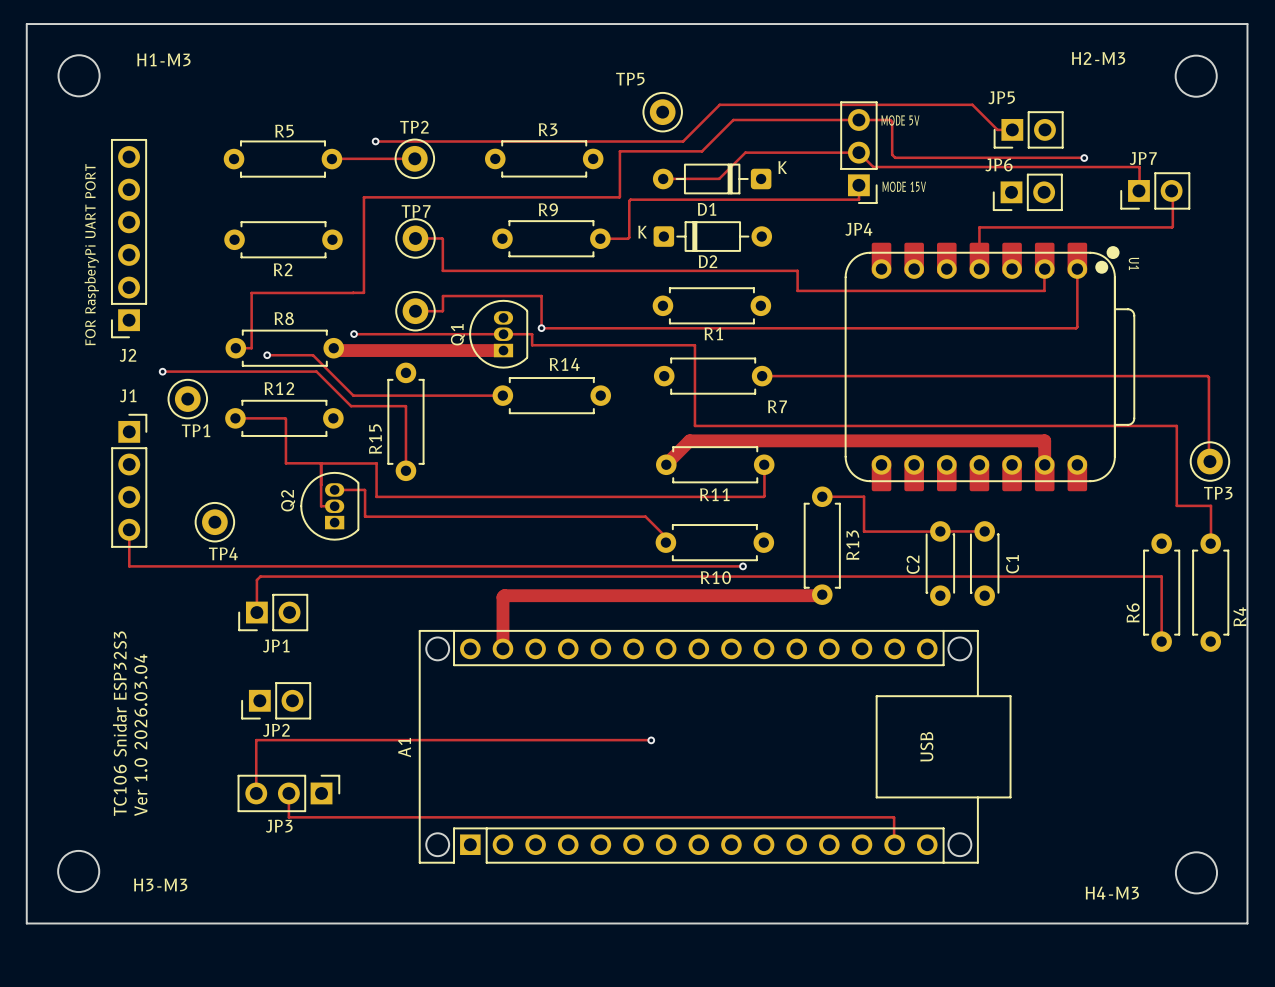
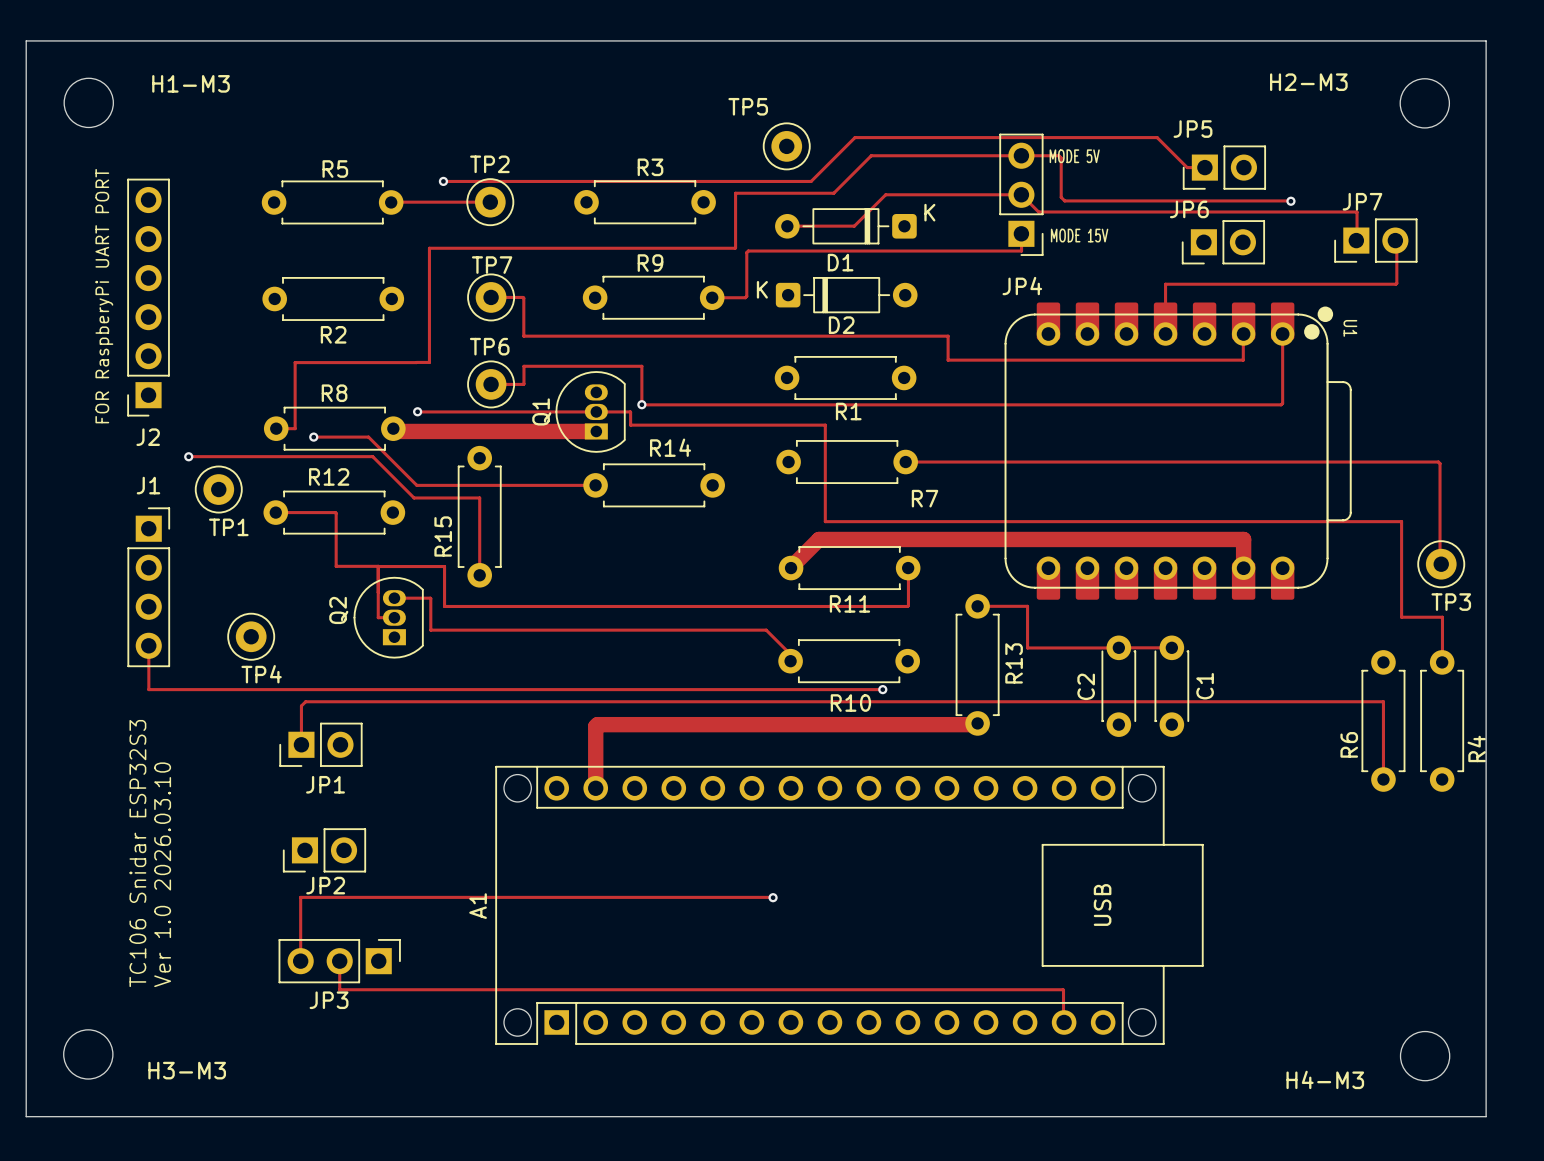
TP6 name: none -> TP6 (489, 346)
text: Ver 1.0 2026.03.04 (140, 735) -> Ver 1.0 2026.03.10 (162, 874)

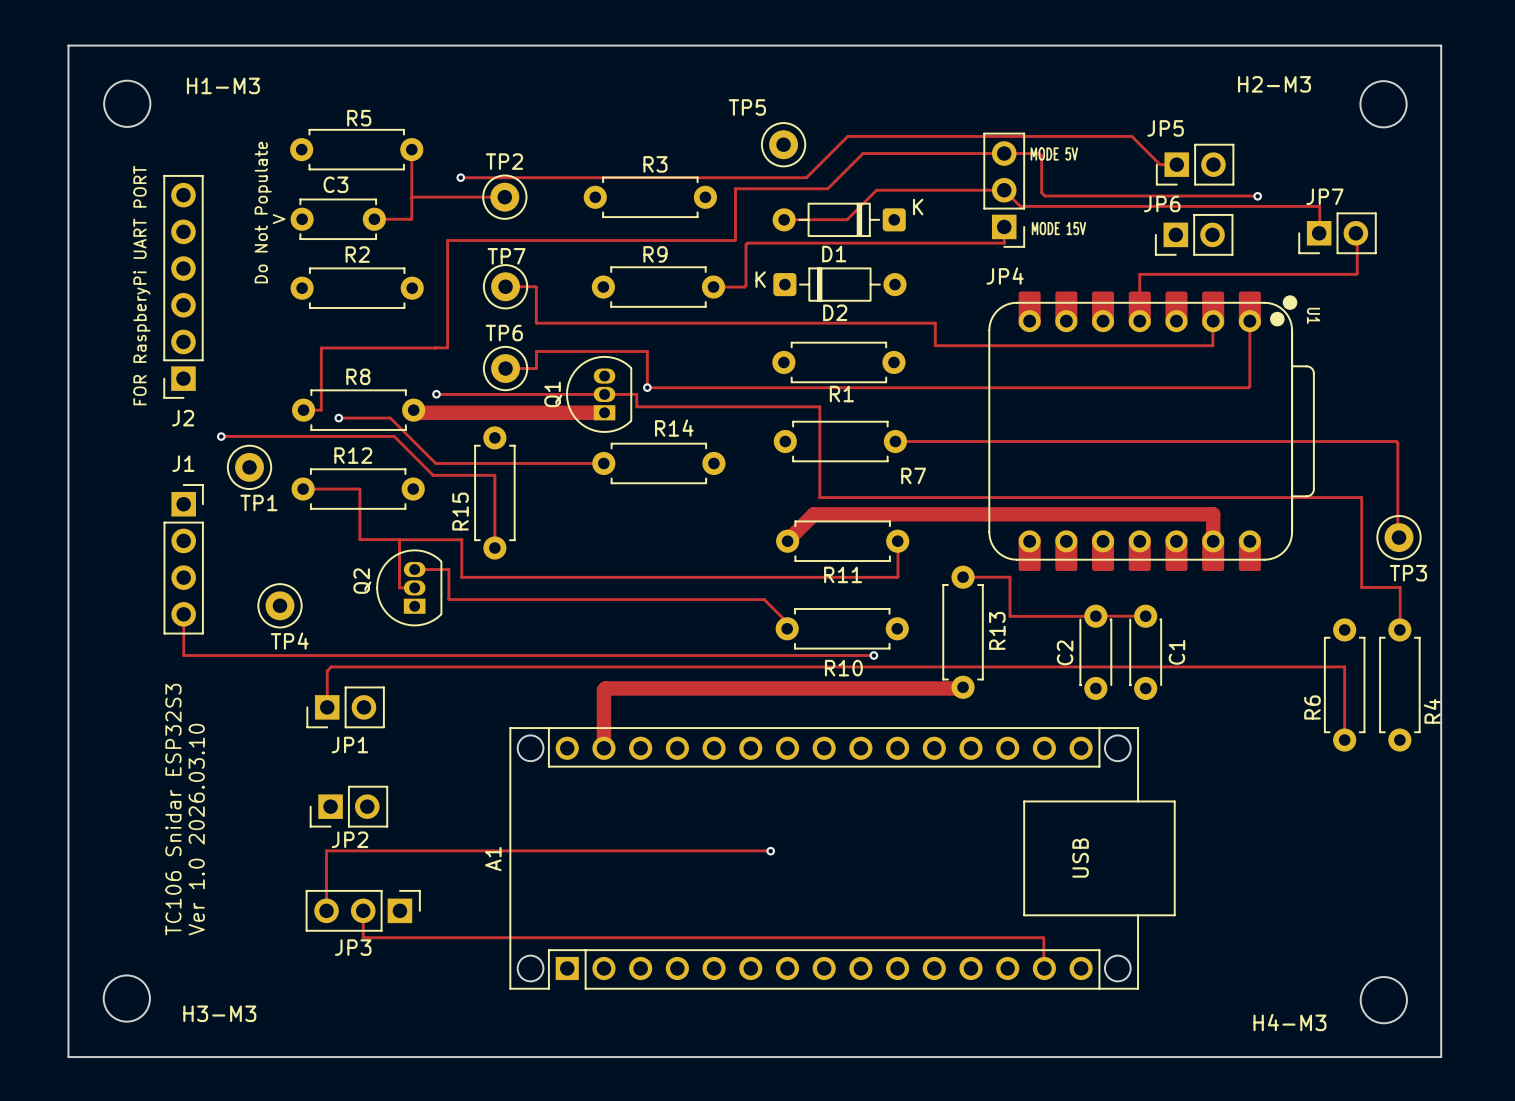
track: none -> (411, 149) (411, 218) (374, 219)
R5 position: (332, 202) -> (356, 149)
text: none -> Do Not Populate (263, 212)
text: none -> > (279, 219)
C3: none -> (338, 219)
R2 name position: R2 (333, 334) -> R2 (357, 254)

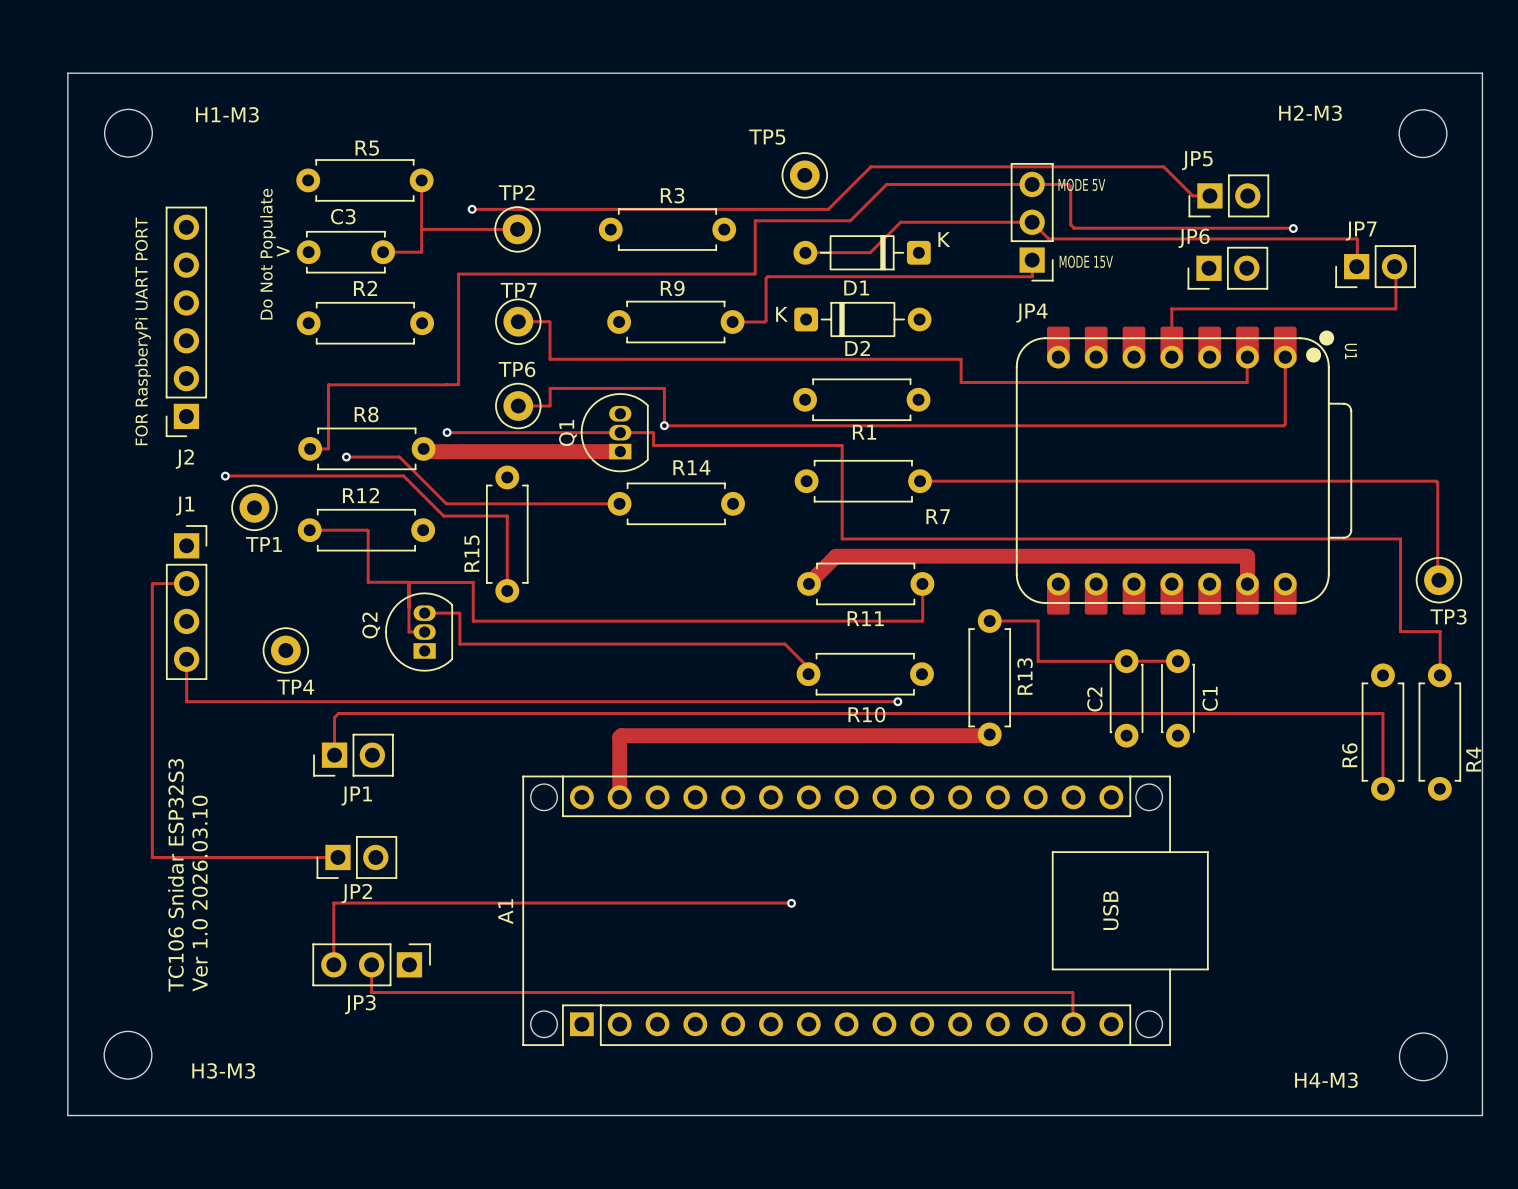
track: none -> (186, 583) (152, 584) (152, 857) (337, 857)

